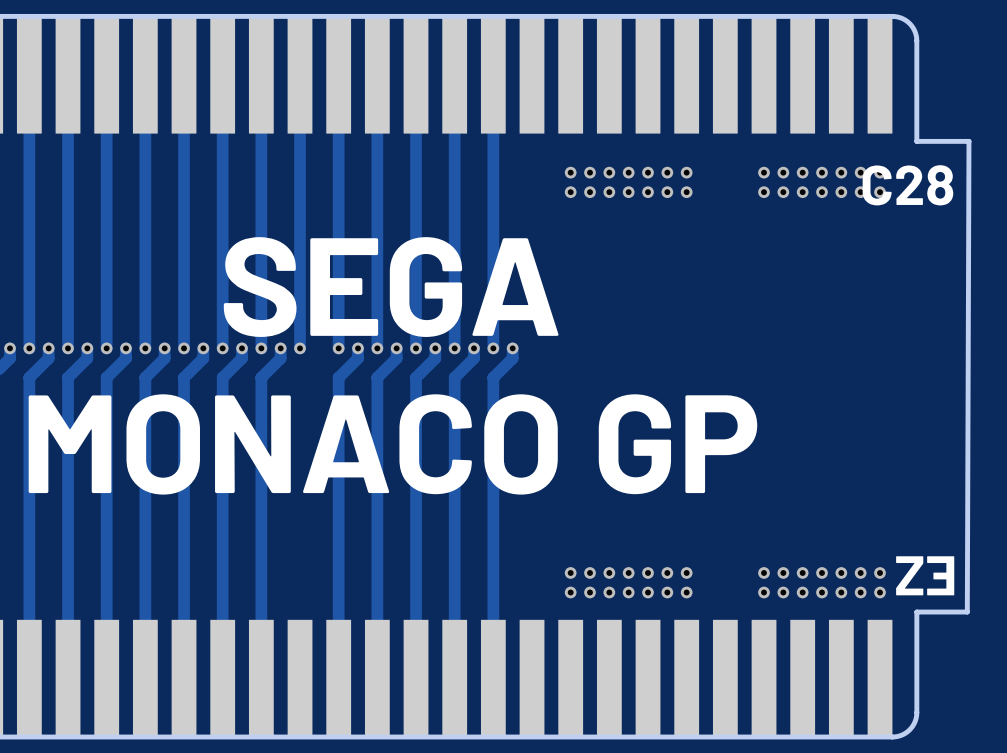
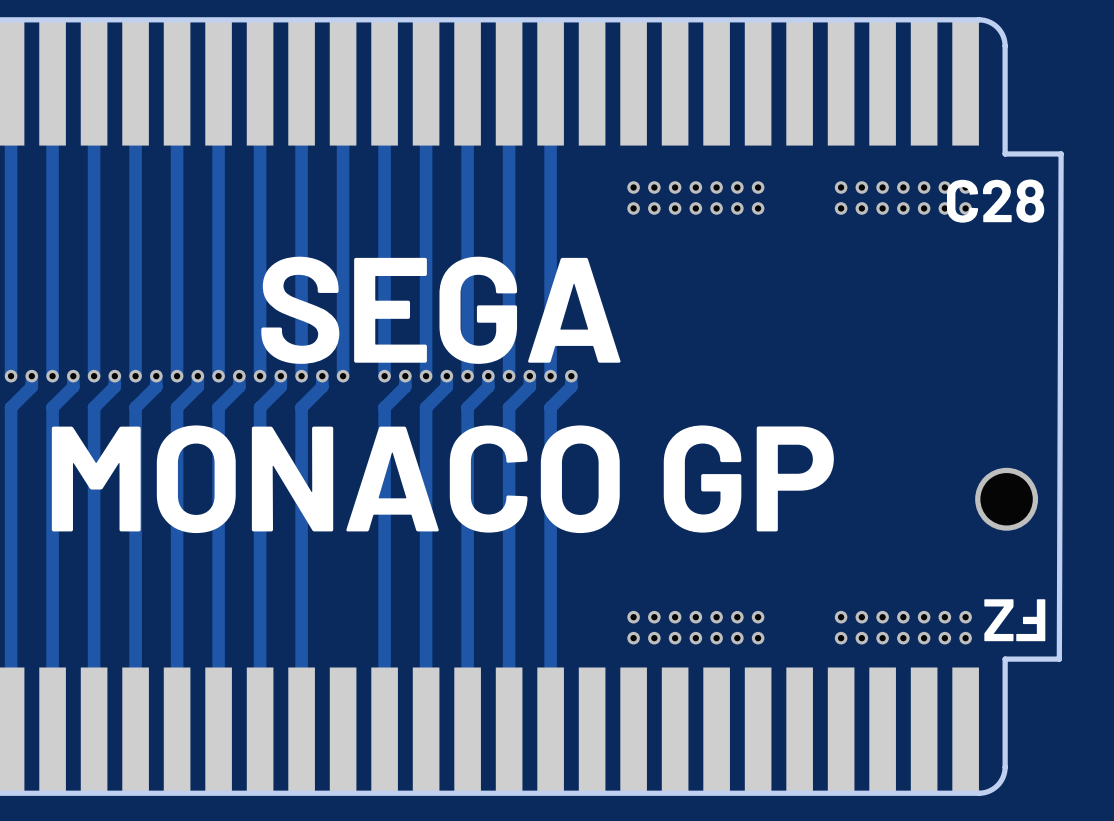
via: none -> (1006, 499)
text: EZ (925, 575) -> FZ (1014, 620)

